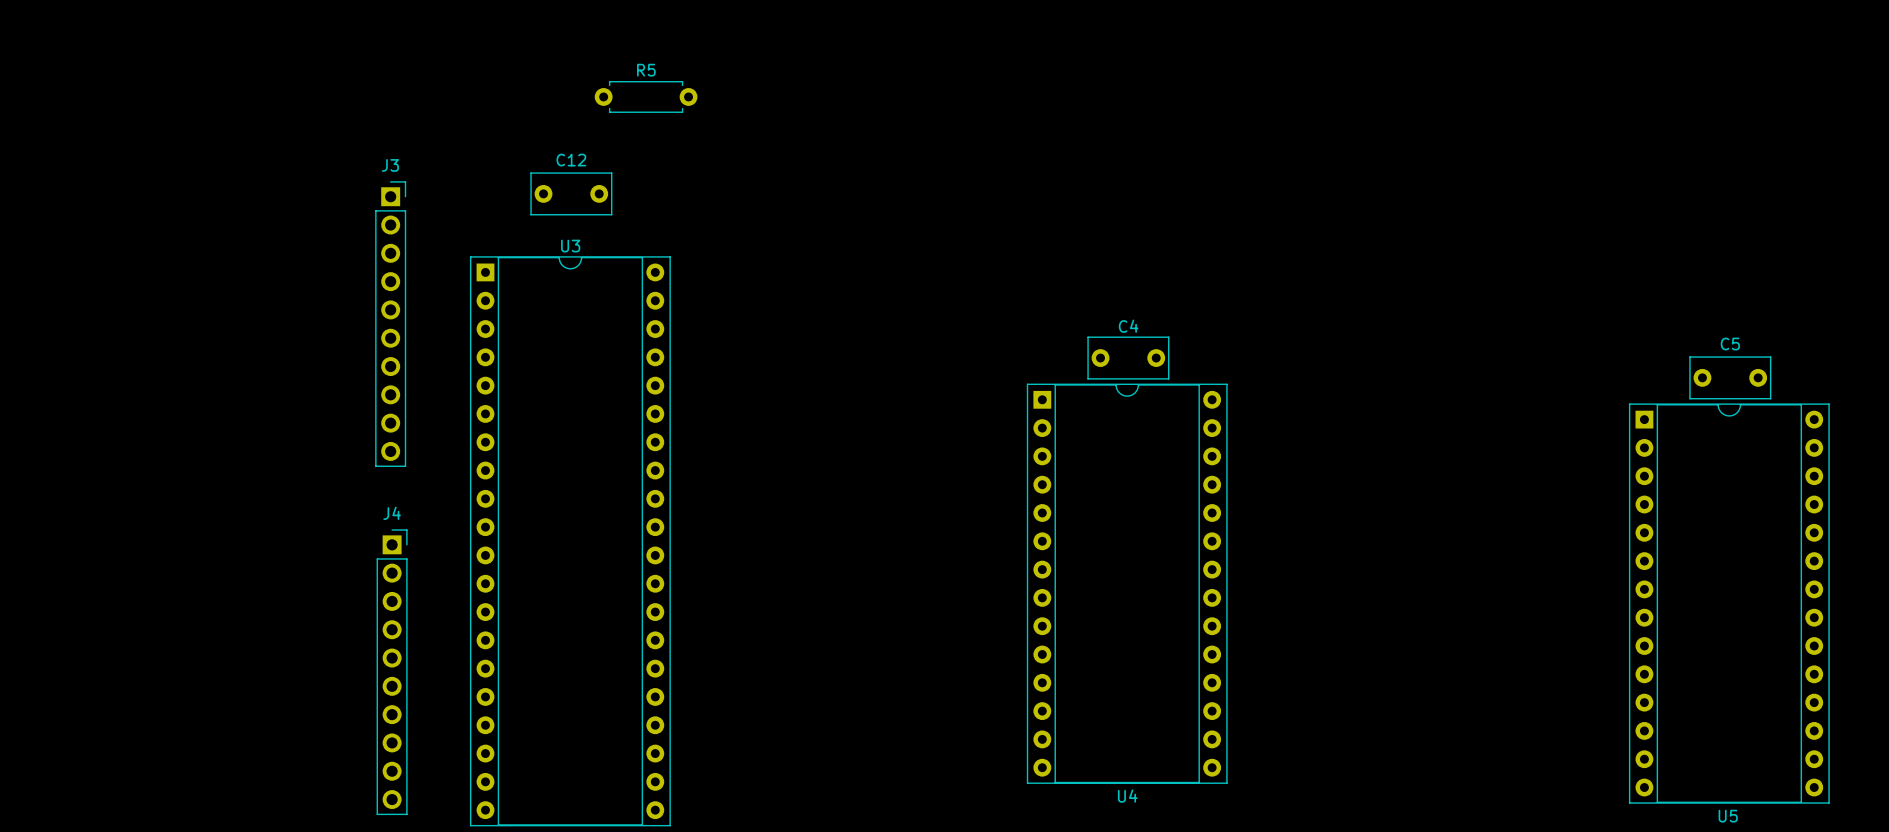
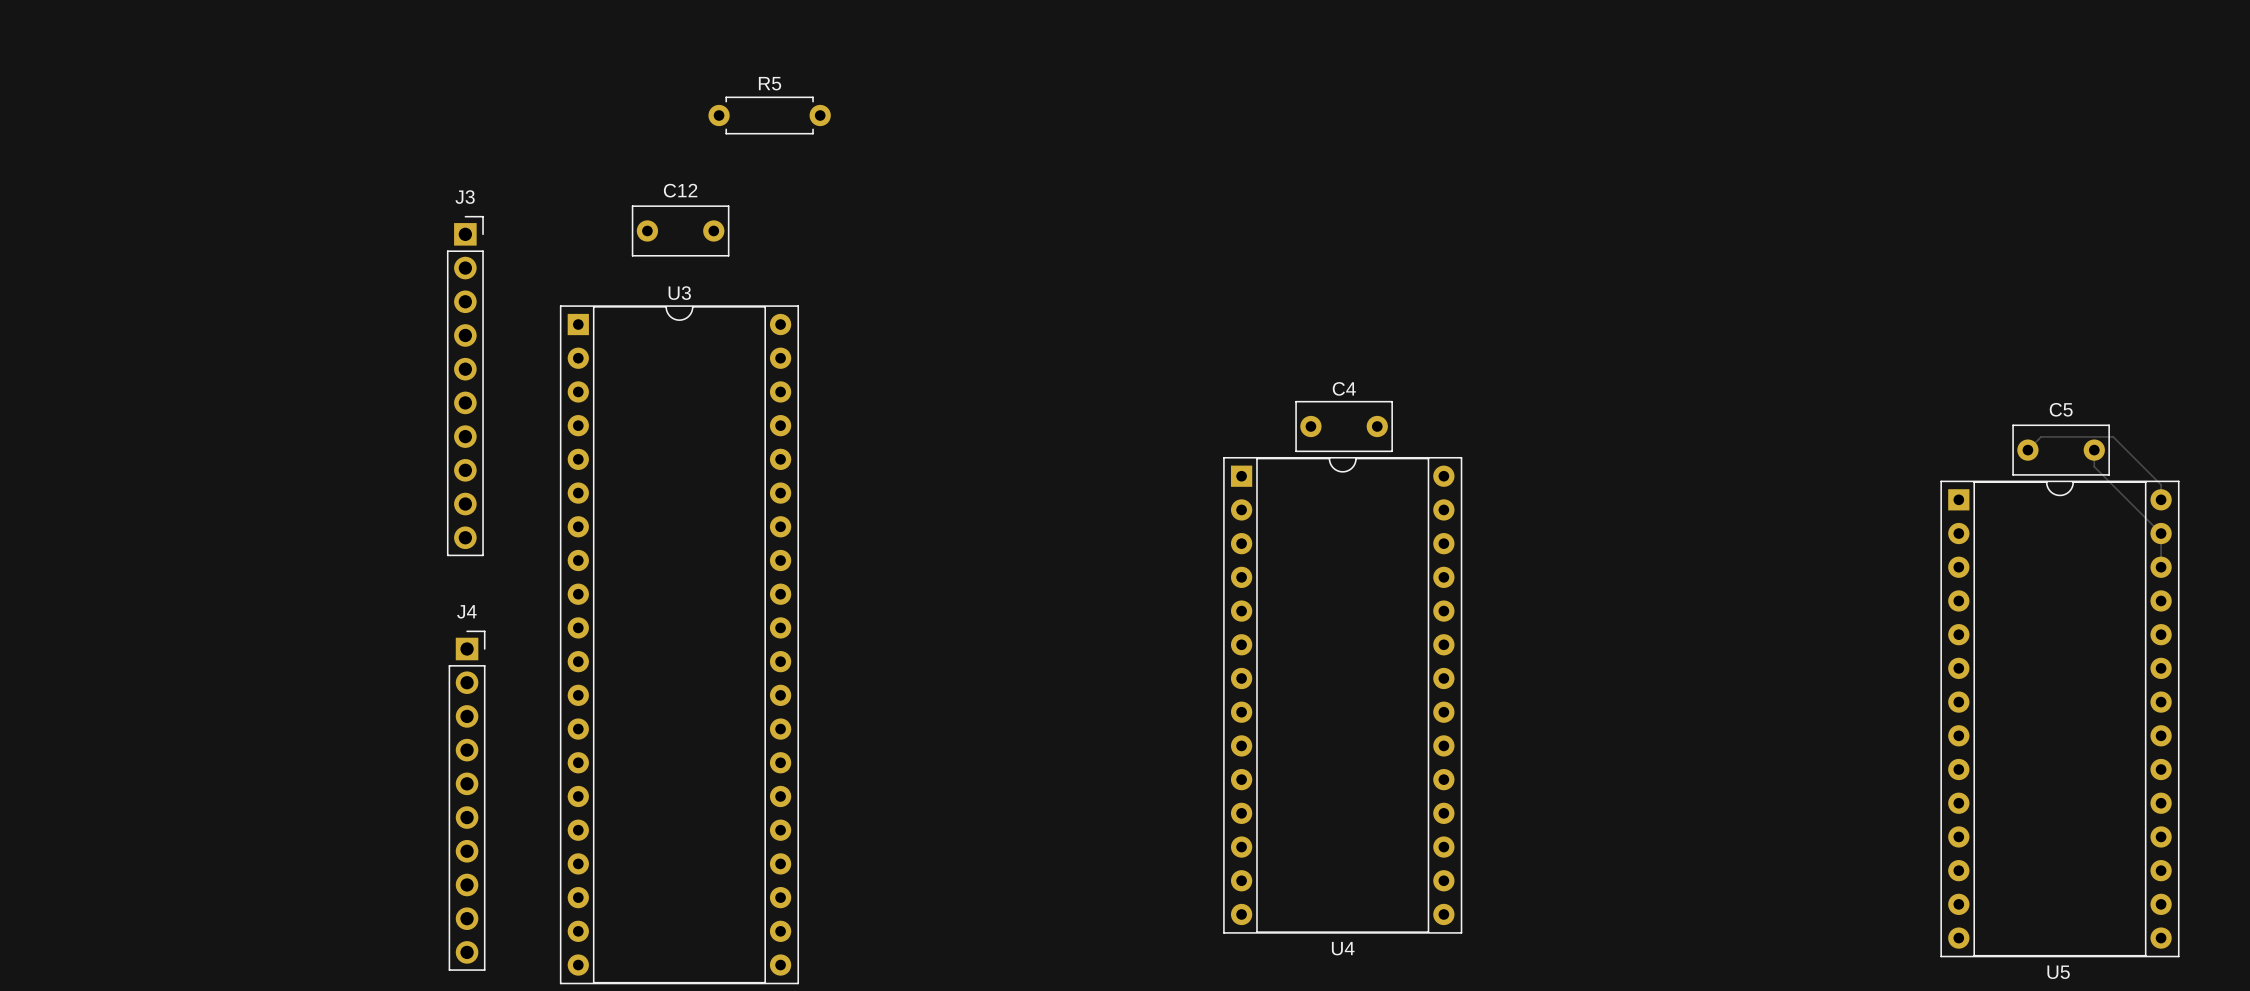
track: none -> (2027, 450) (2041, 436) (2113, 436) (2161, 484) (2161, 499)
track: none -> (2094, 450) (2094, 466) (2161, 533) (2161, 567)

